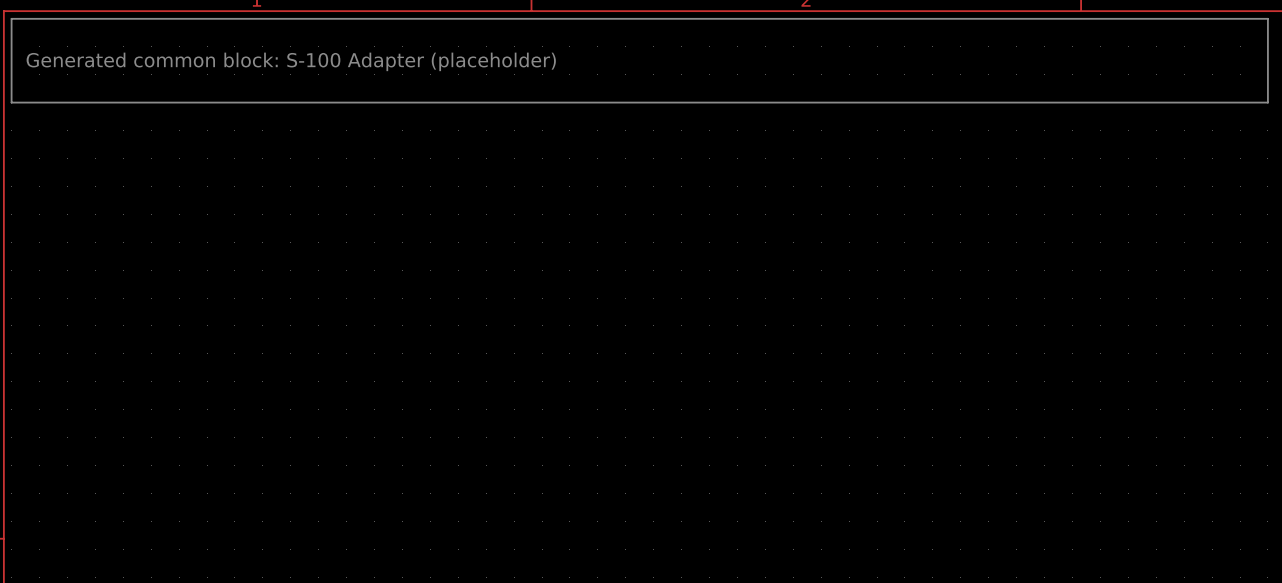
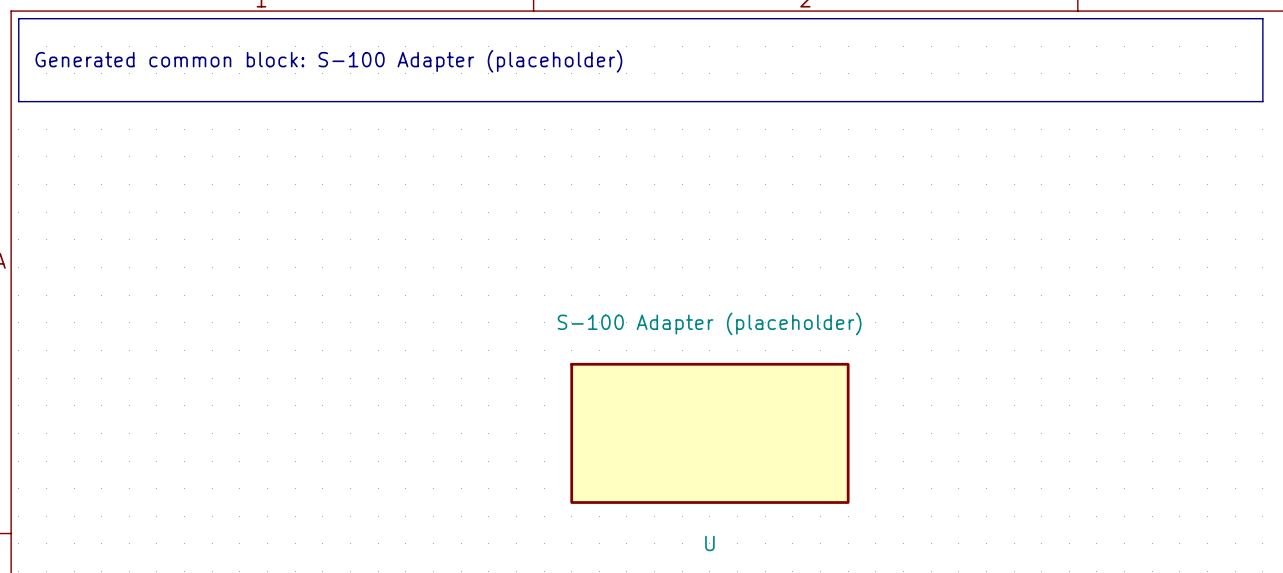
U: none -> S-100 Adapter (placeholder) (709, 433)

